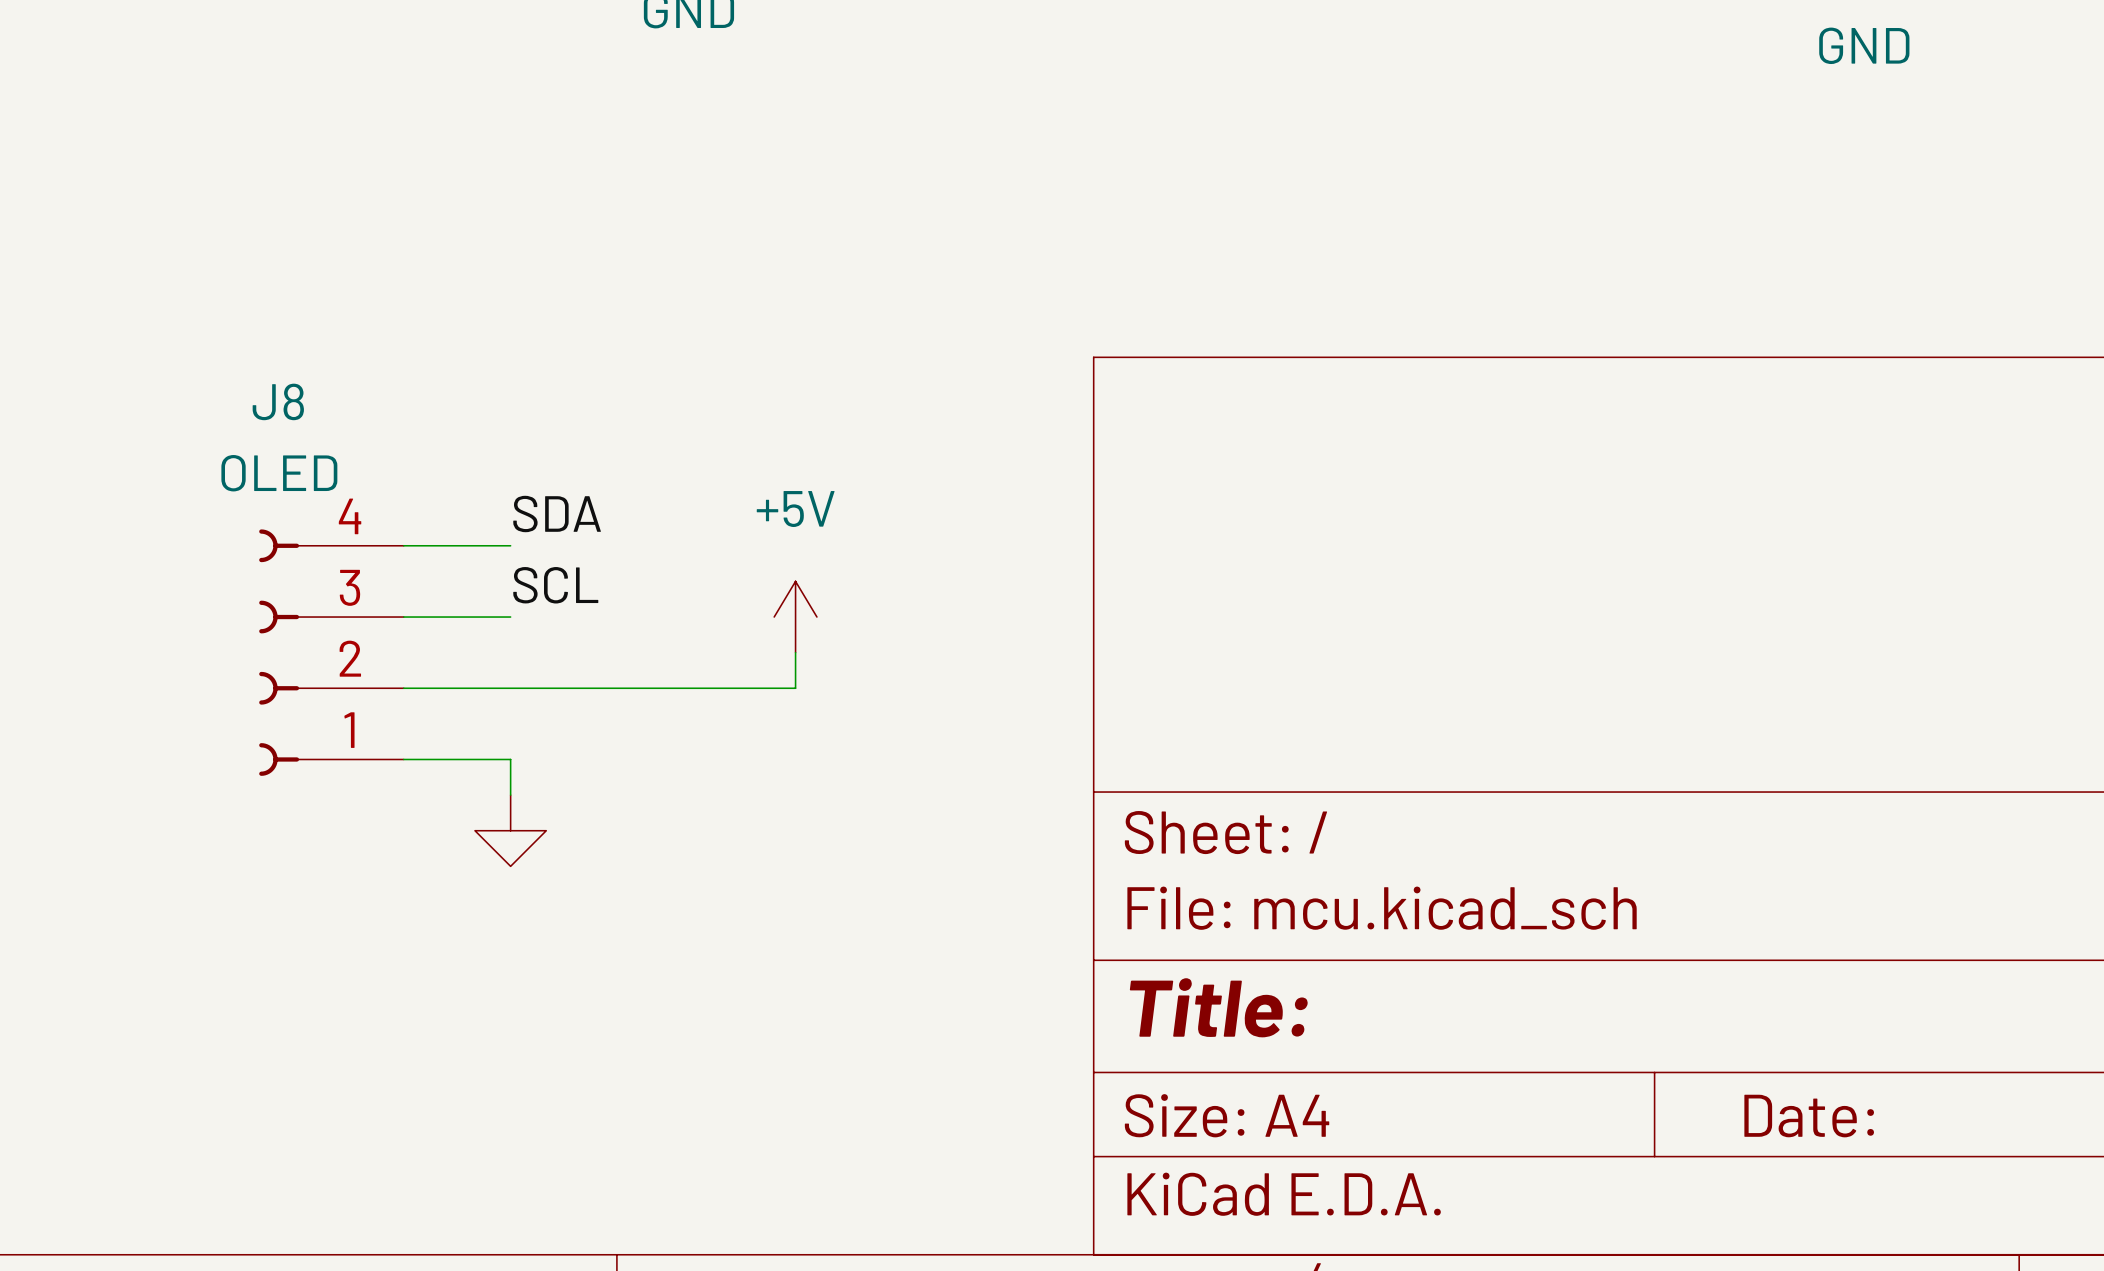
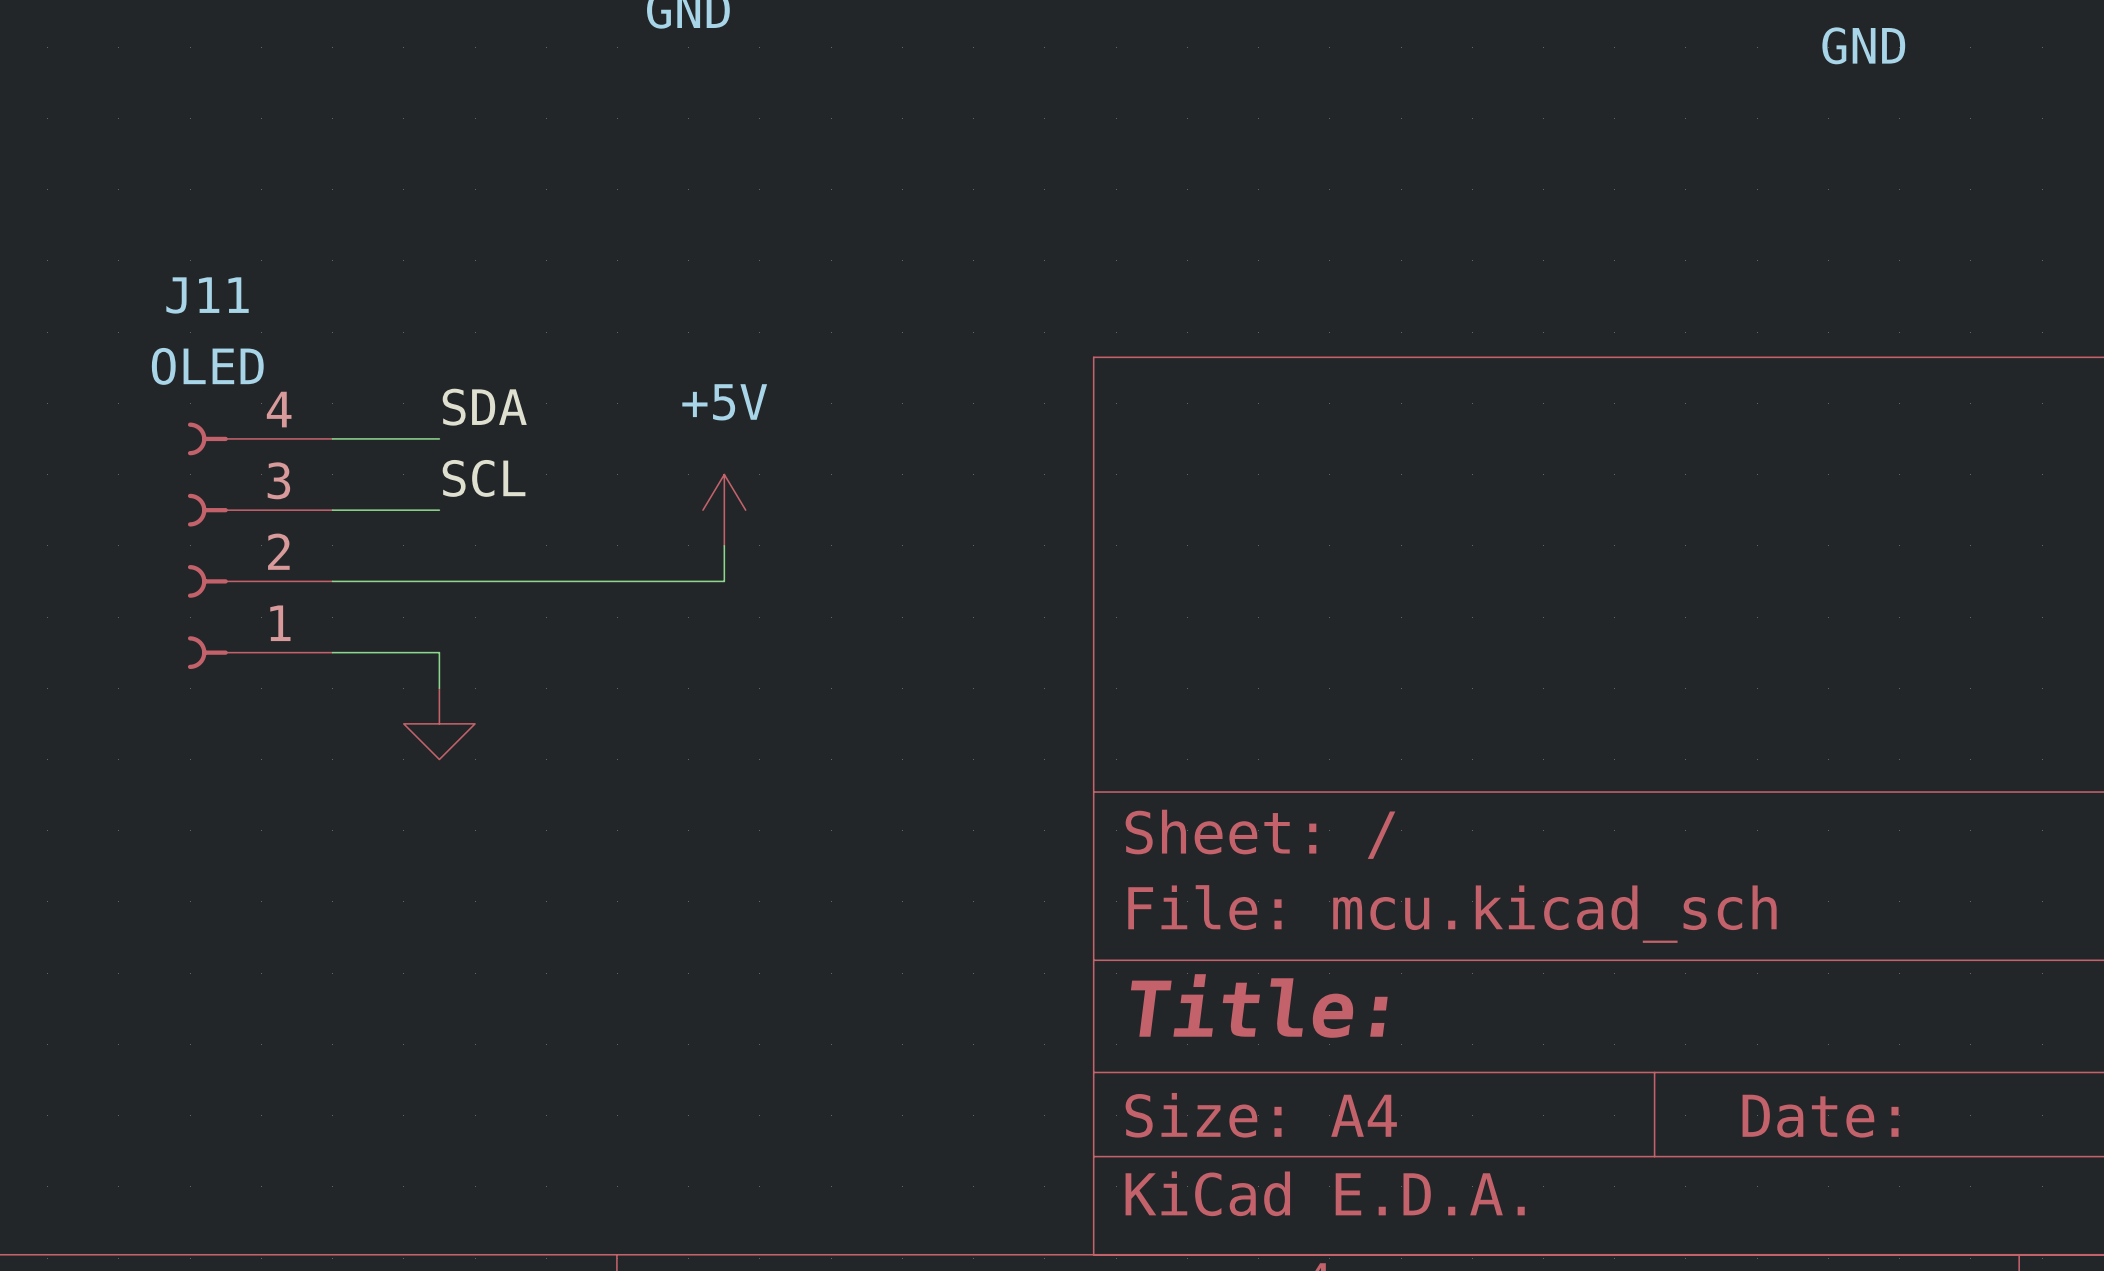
label position: SDA (557, 514) -> SDA (484, 407)
J11: none -> OLED (260, 545)
wire: (403, 545) (510, 545) -> (332, 438) (439, 438)
label position: SCL (555, 585) -> SCL (484, 478)
wire: (403, 617) (510, 617) -> (332, 510) (439, 510)
power symbol position: +5V (795, 617) -> +5V (724, 510)
J8: OLED (331, 652) -> none
wire: (795, 652) (795, 688) (403, 688) -> (724, 545) (724, 581) (332, 581)
wire: (403, 759) (510, 759) (510, 795) -> (332, 652) (439, 652) (439, 688)
power symbol position: (510, 830) -> (439, 723)

